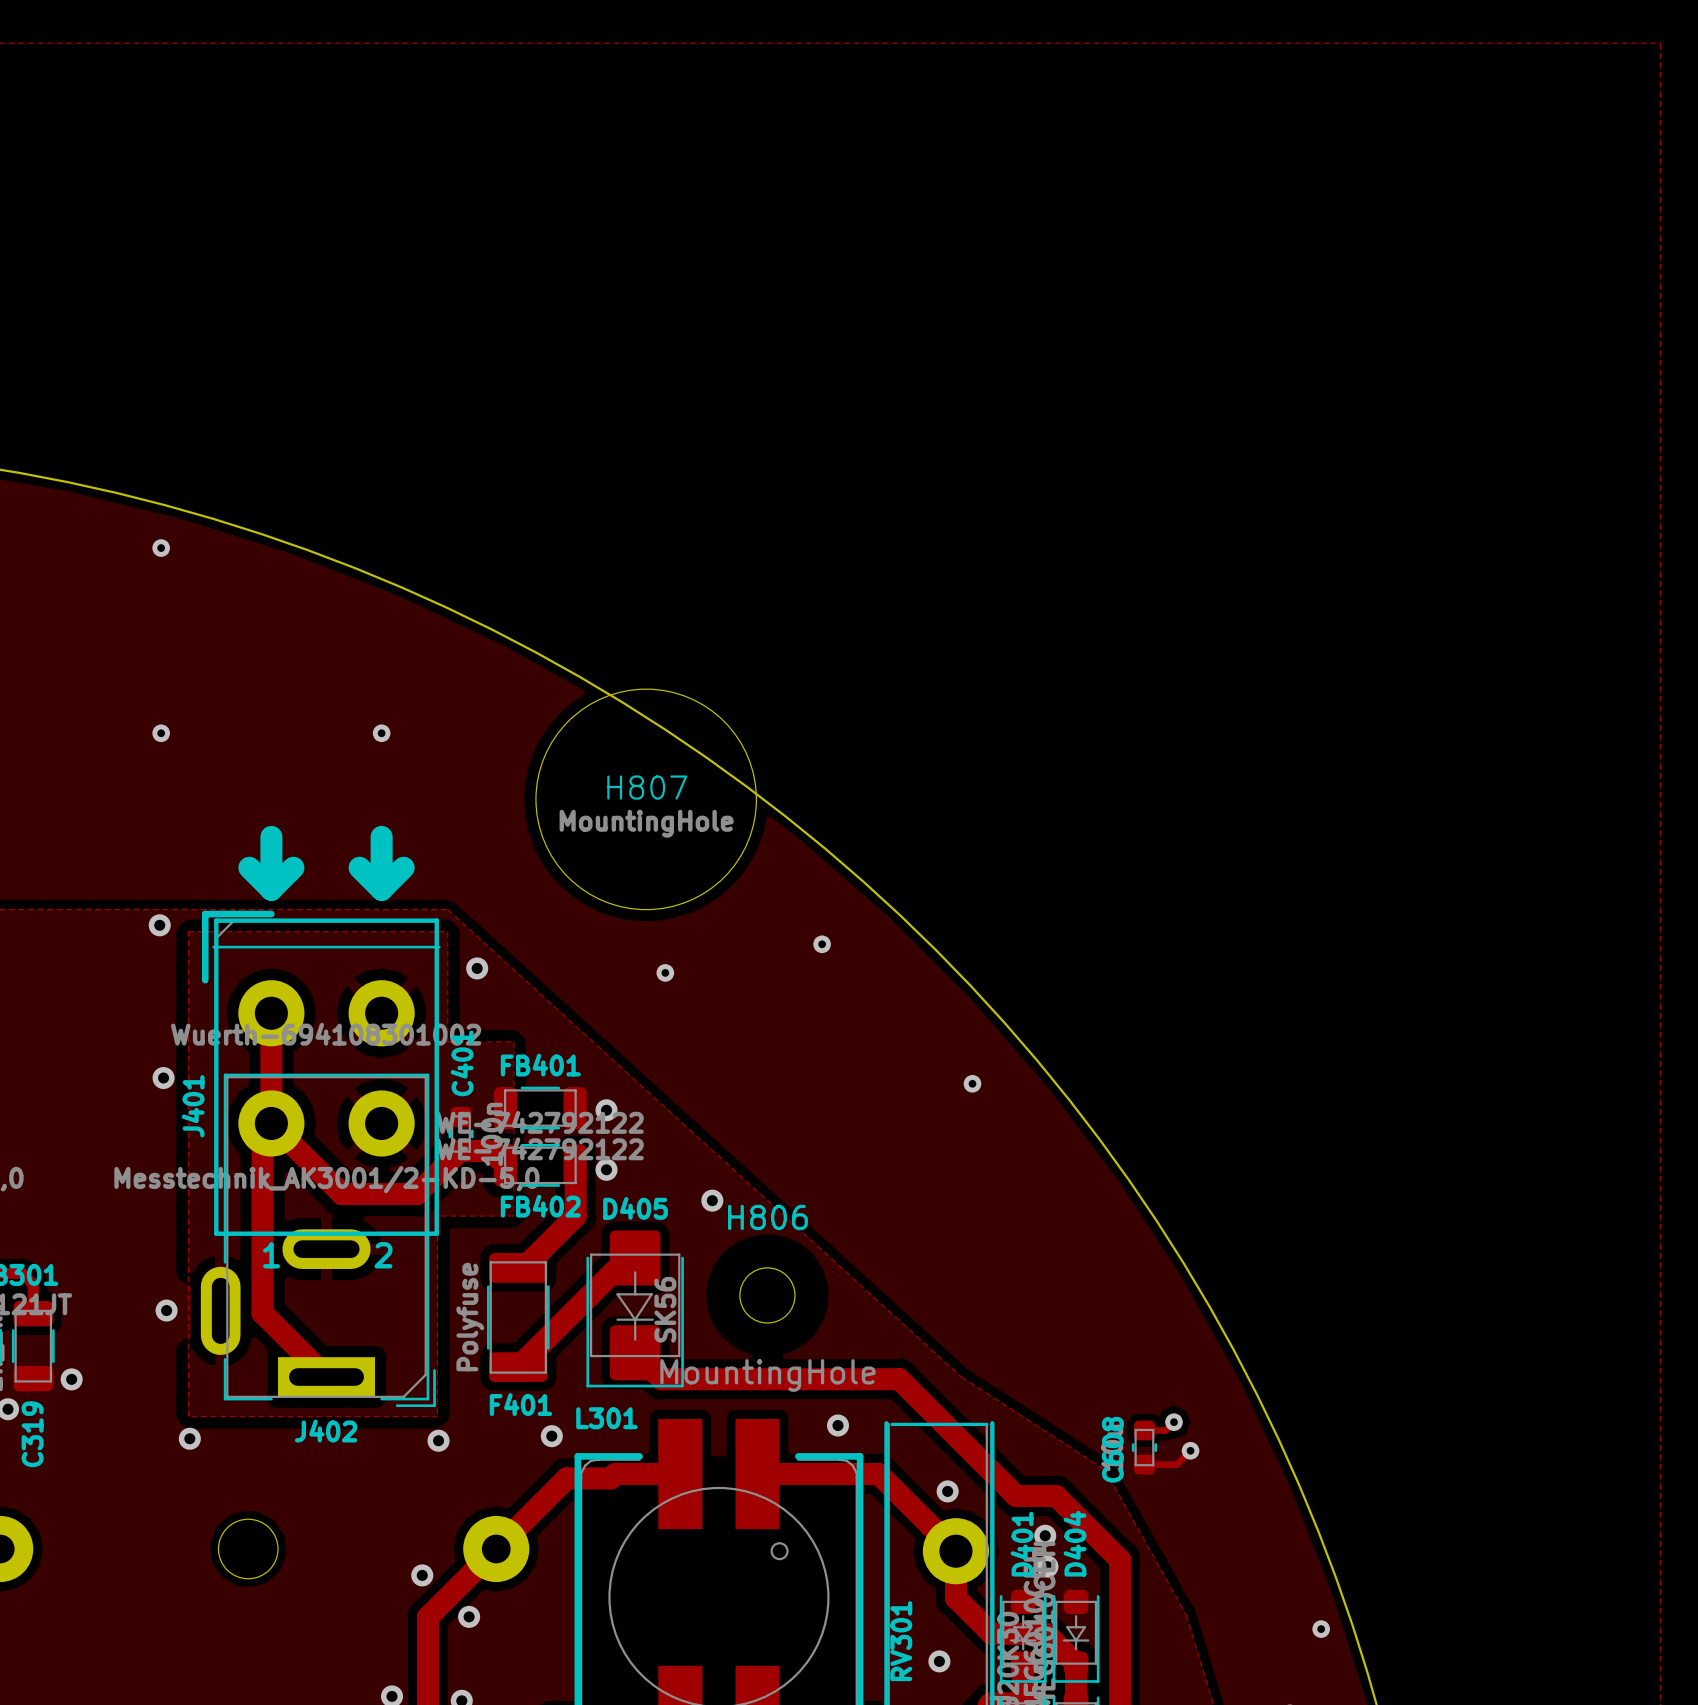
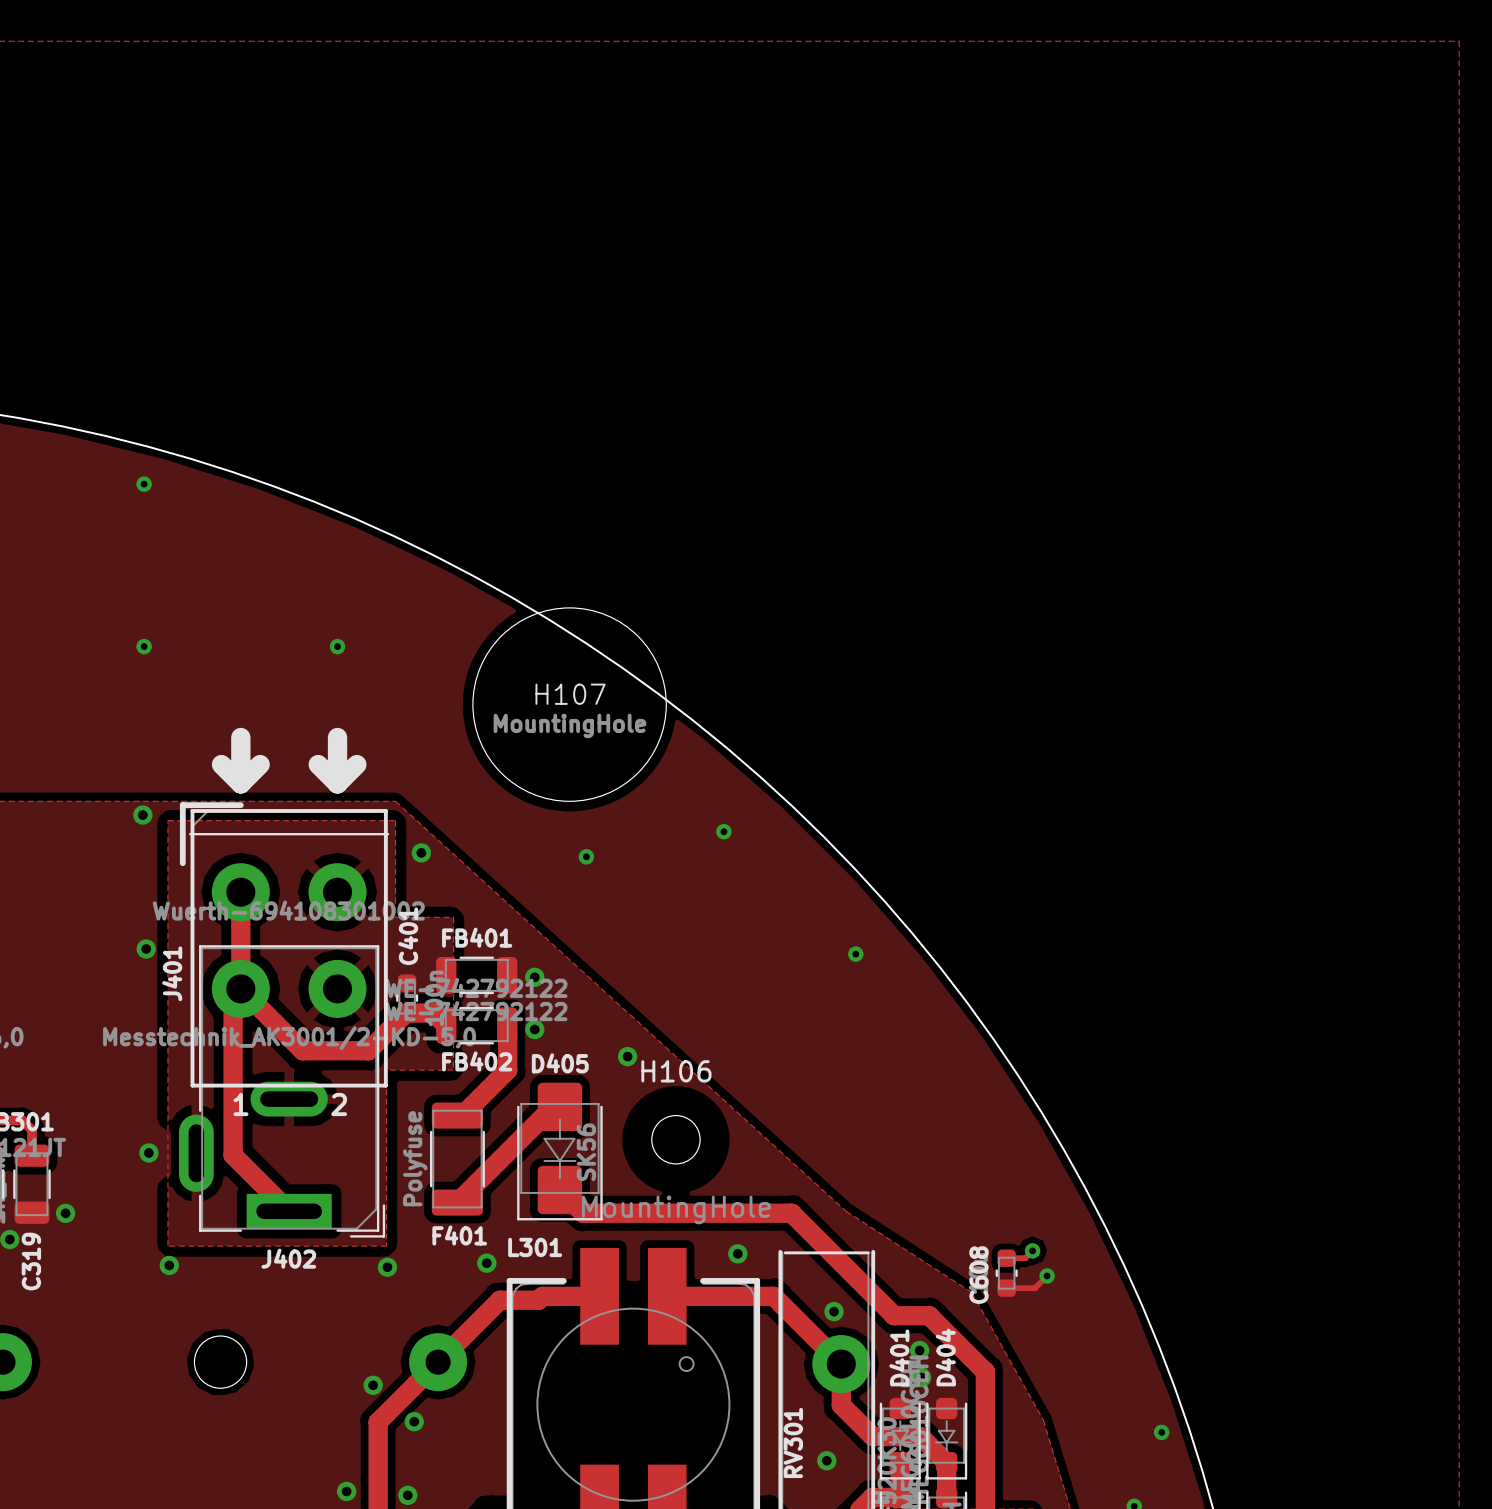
H807 name: H807 (647, 787) -> H107 (570, 694)
H806 name: H806 (767, 1217) -> H106 (676, 1071)

